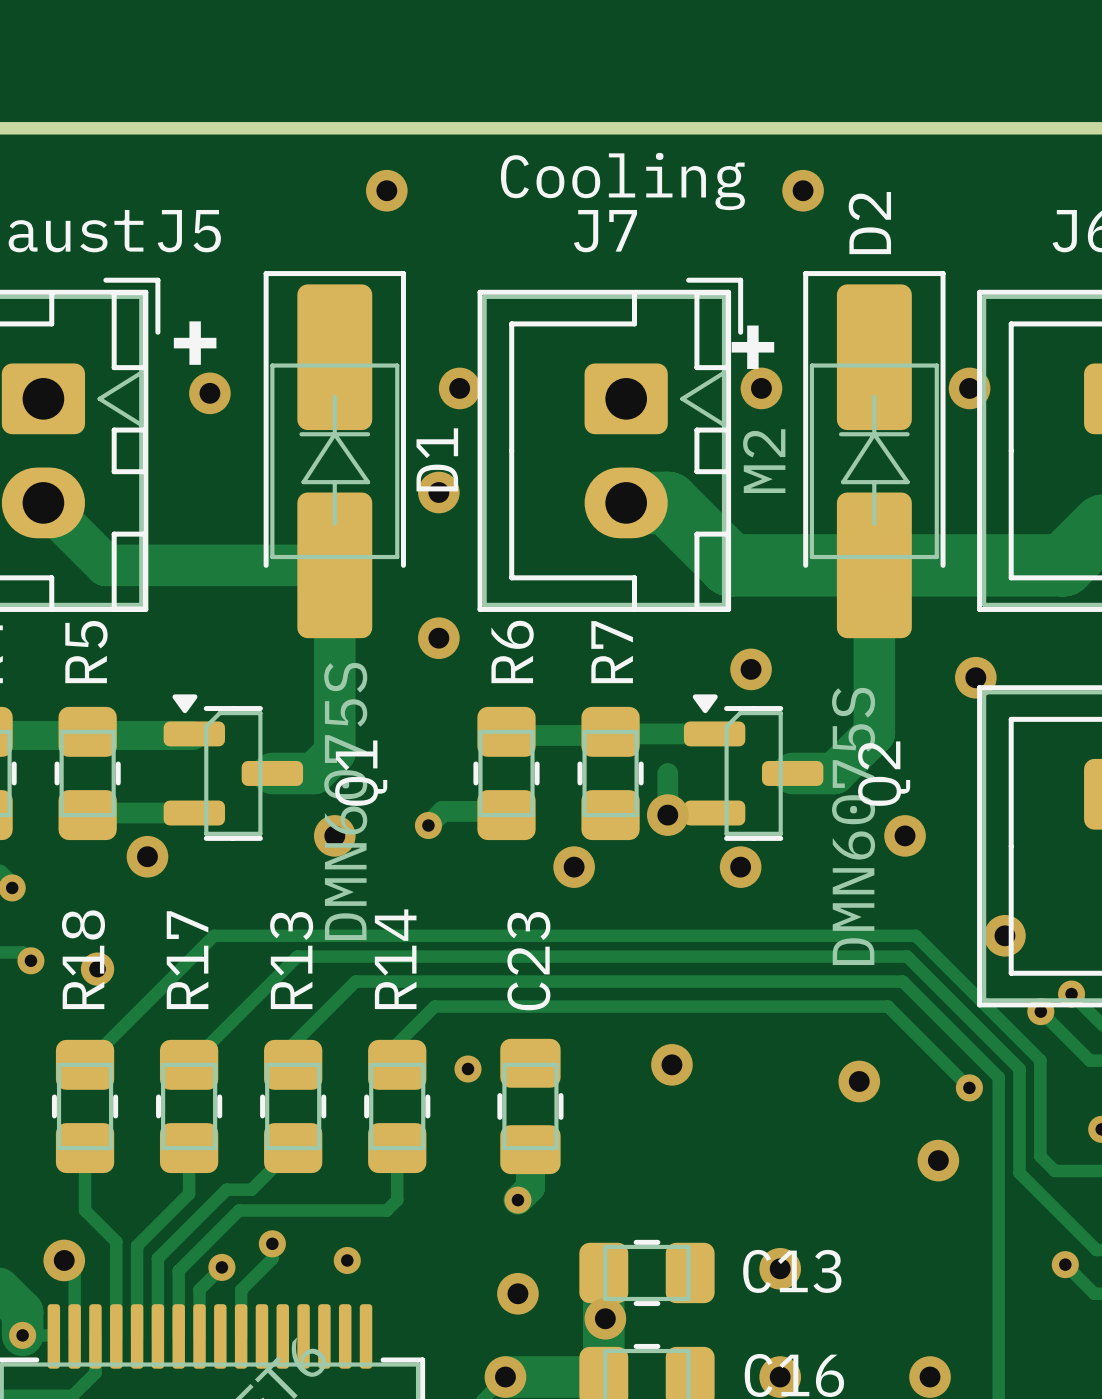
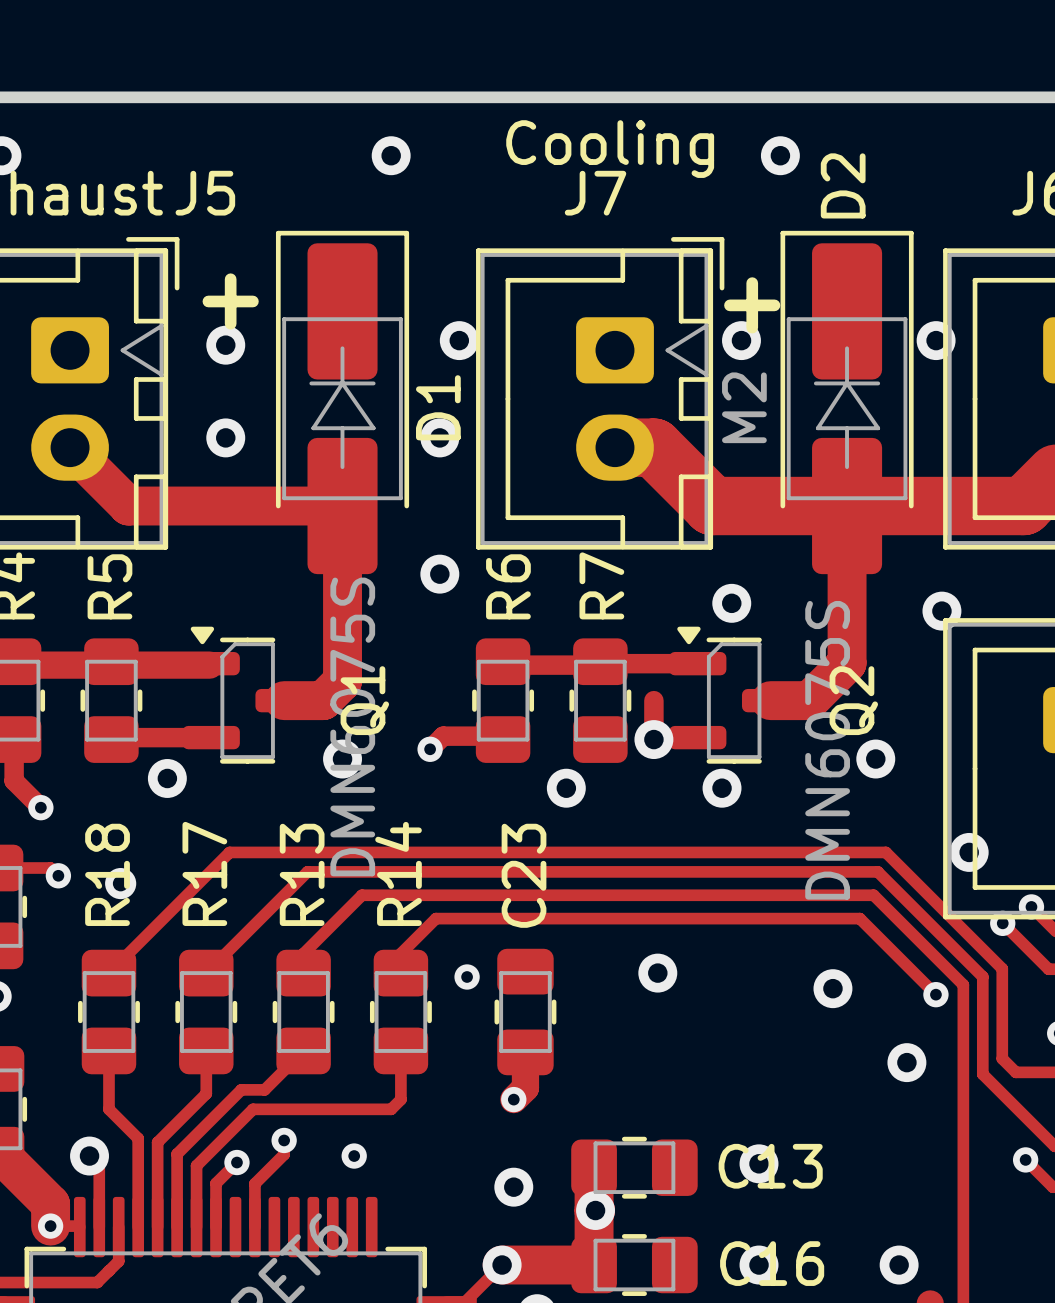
via: none -> (225, 437)

